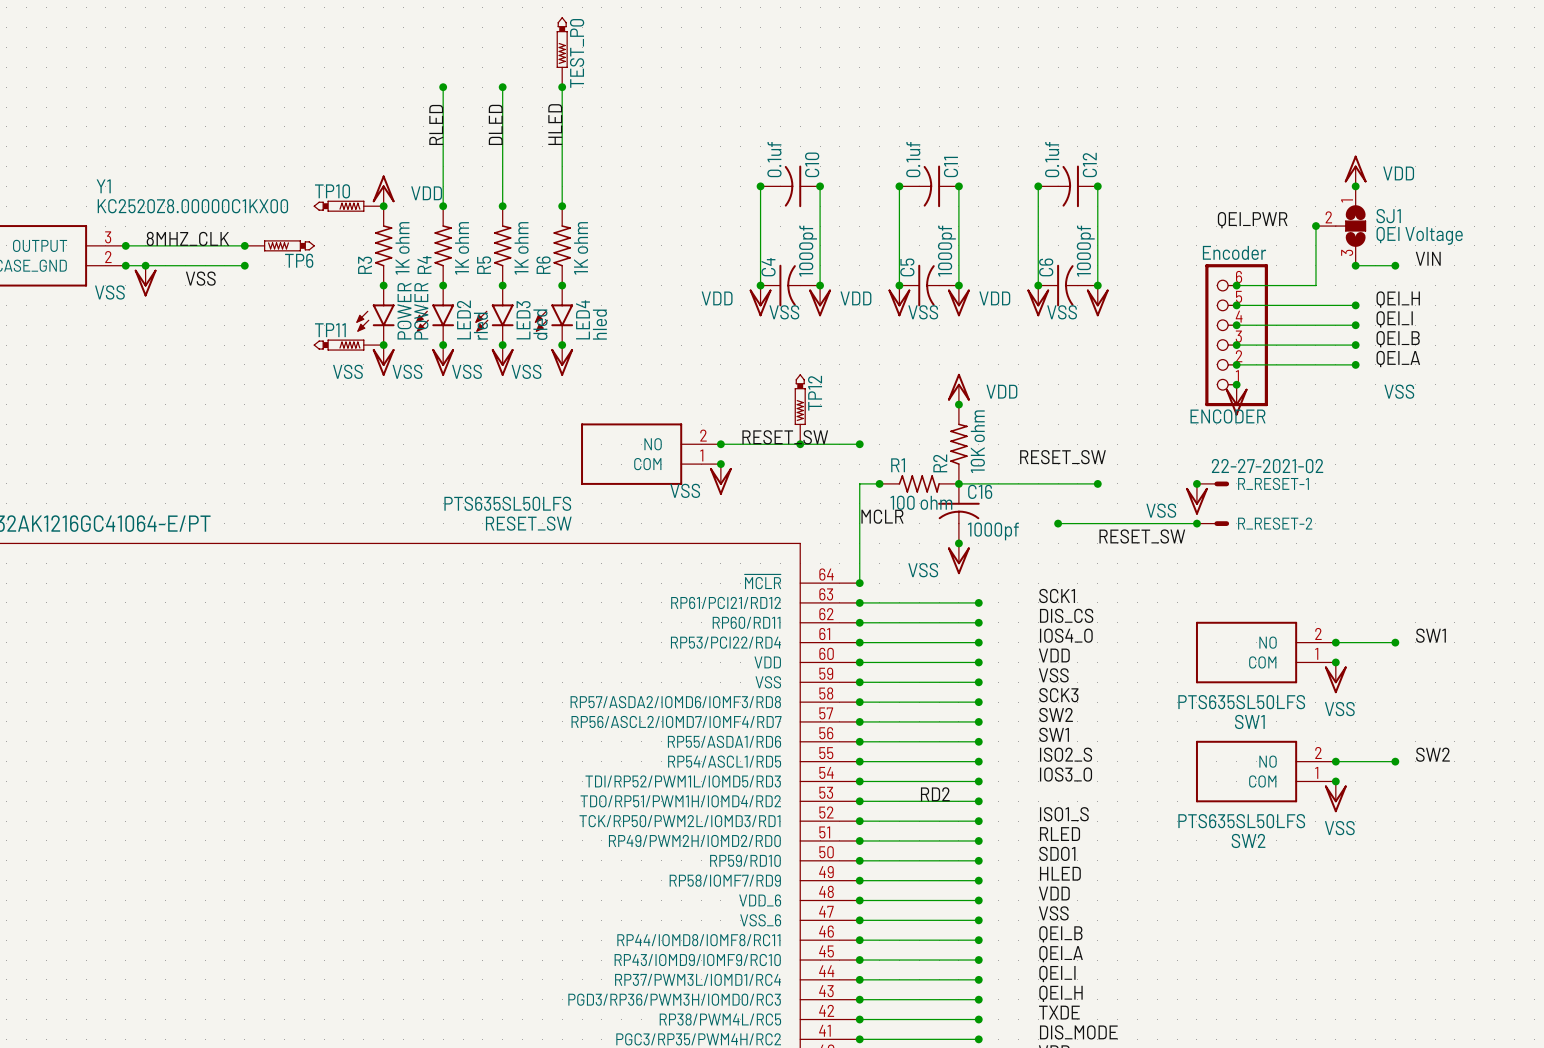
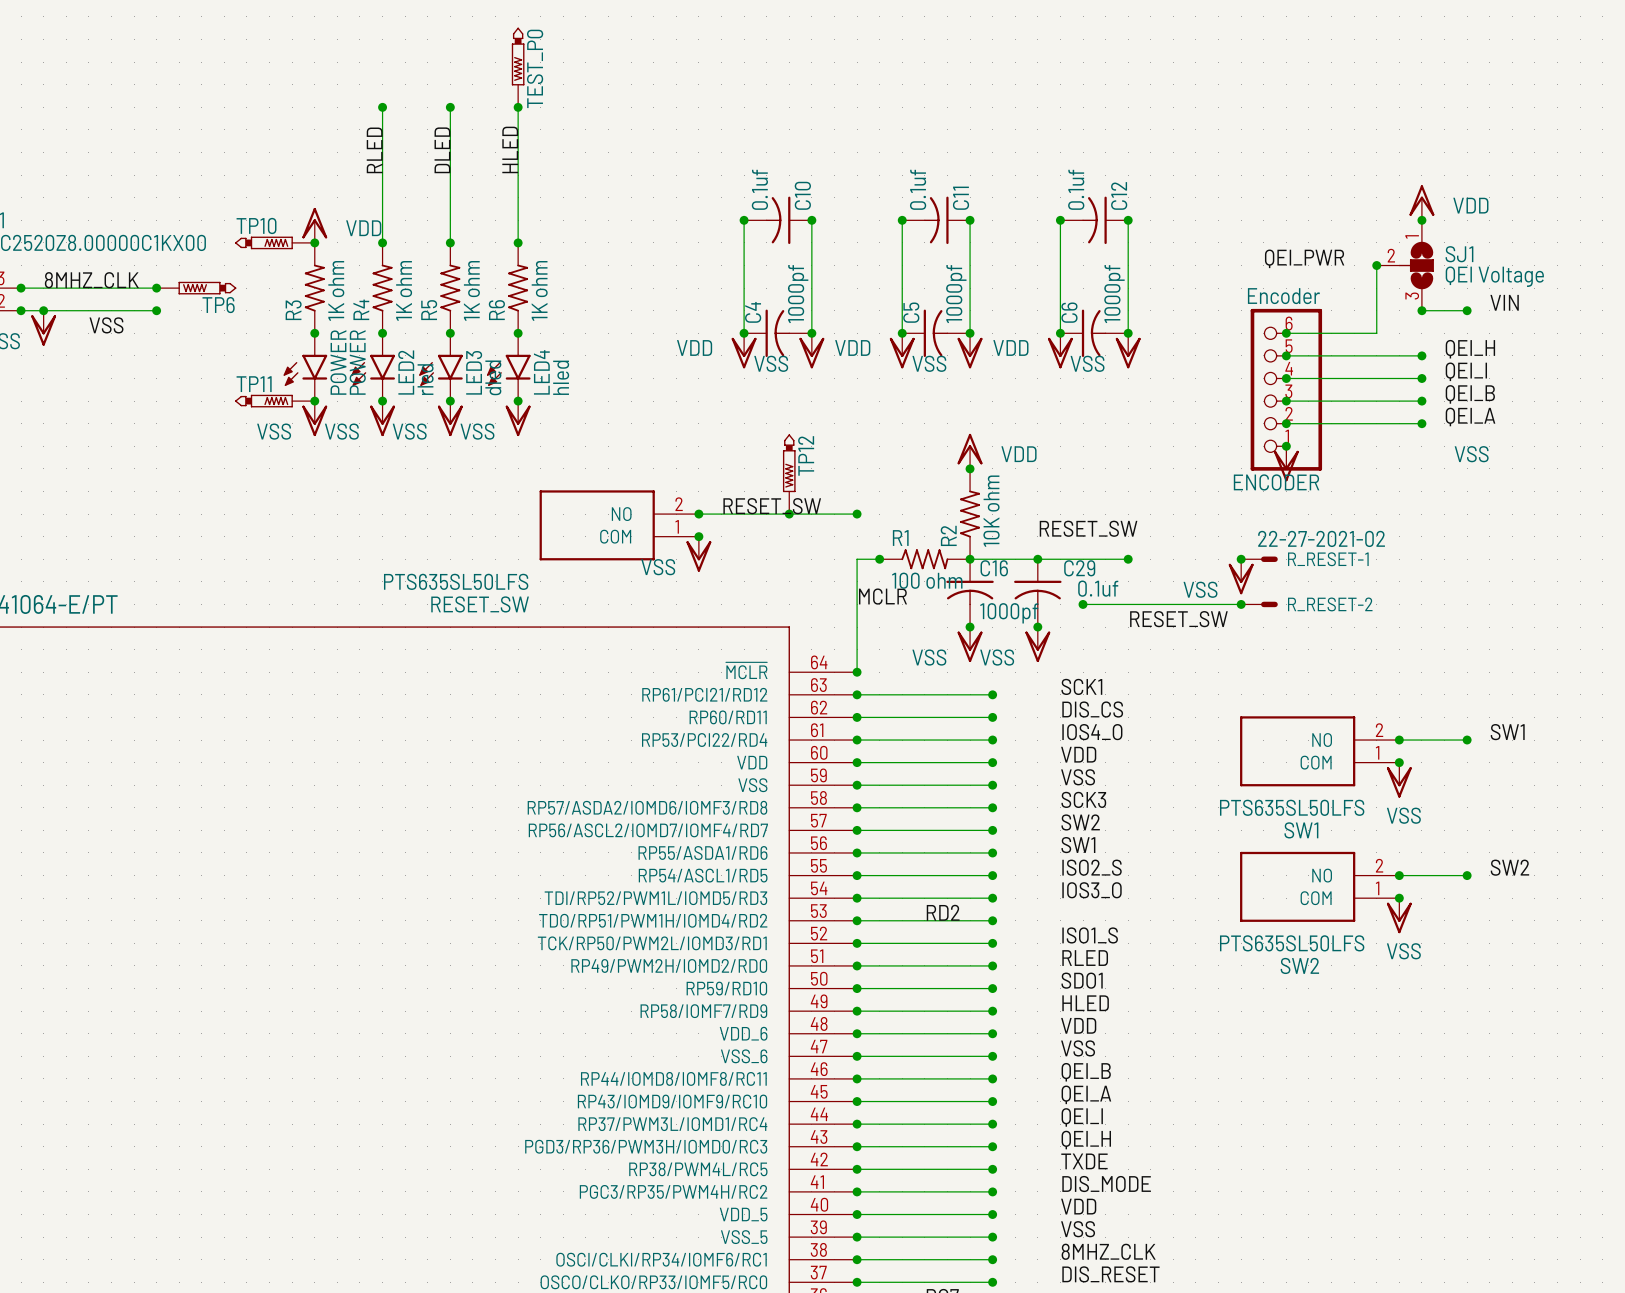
junction: none -> (1037, 559)
C29: none -> 0.1uf (1037, 593)
junction: none -> (1037, 627)
power symbol: none -> VSS (1037, 644)

